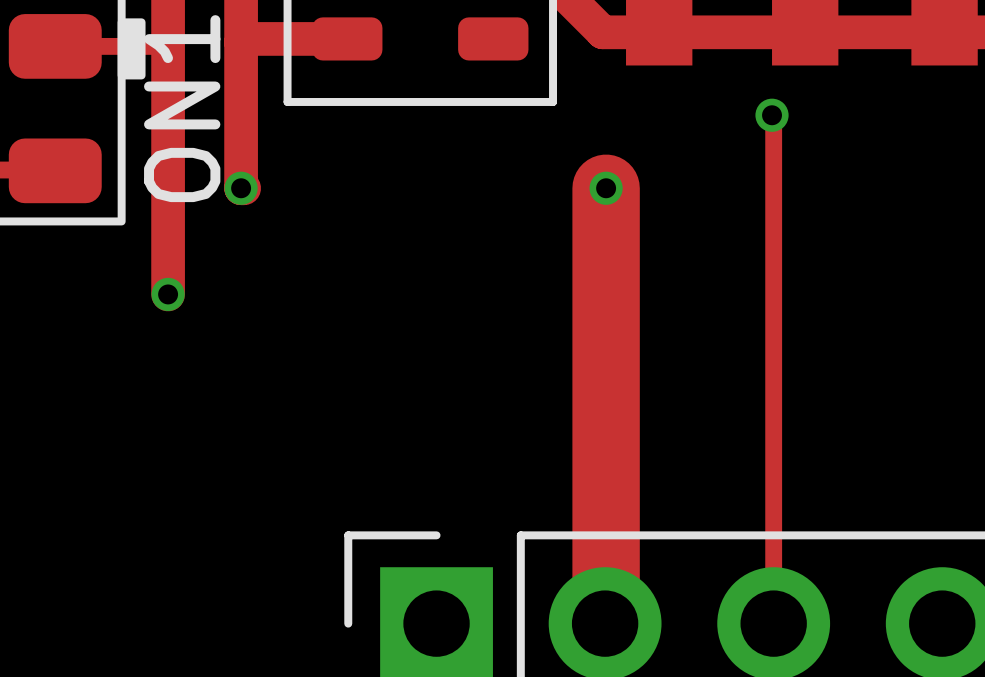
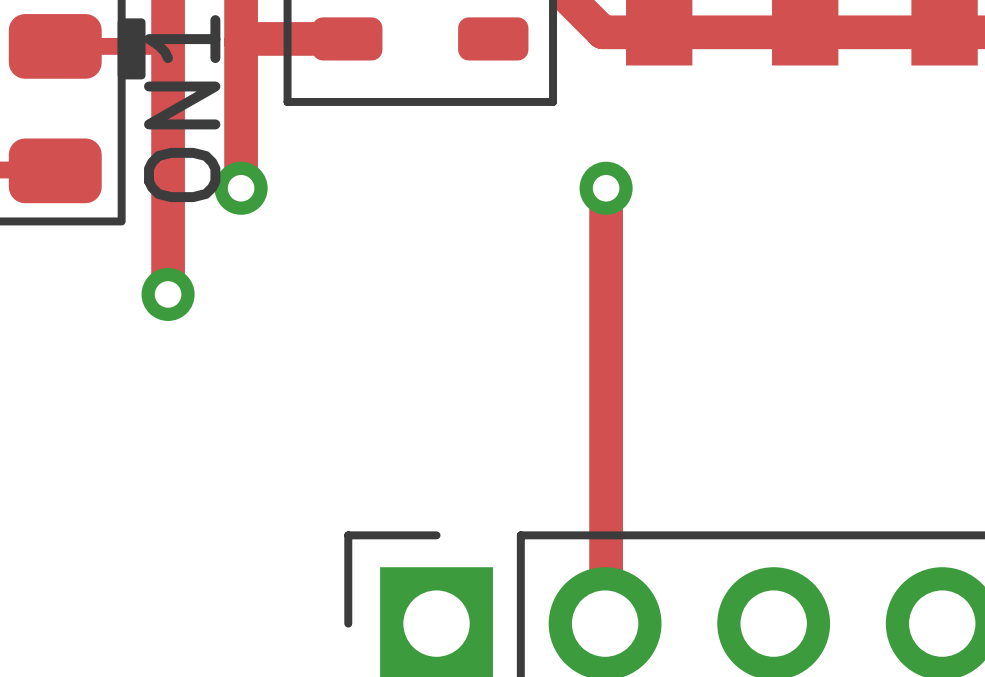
track: (772, 115) (773, 116) (773, 623) -> none
via: (772, 115) -> none
via size: [224, 171, 258, 205] -> [214, 161, 268, 215]
via size: [589, 171, 623, 205] -> [579, 161, 633, 215]
track width: thick (606, 188) (605, 623) -> thin (606, 188) (605, 623)
via size: [151, 277, 185, 312] -> [141, 267, 195, 321]

